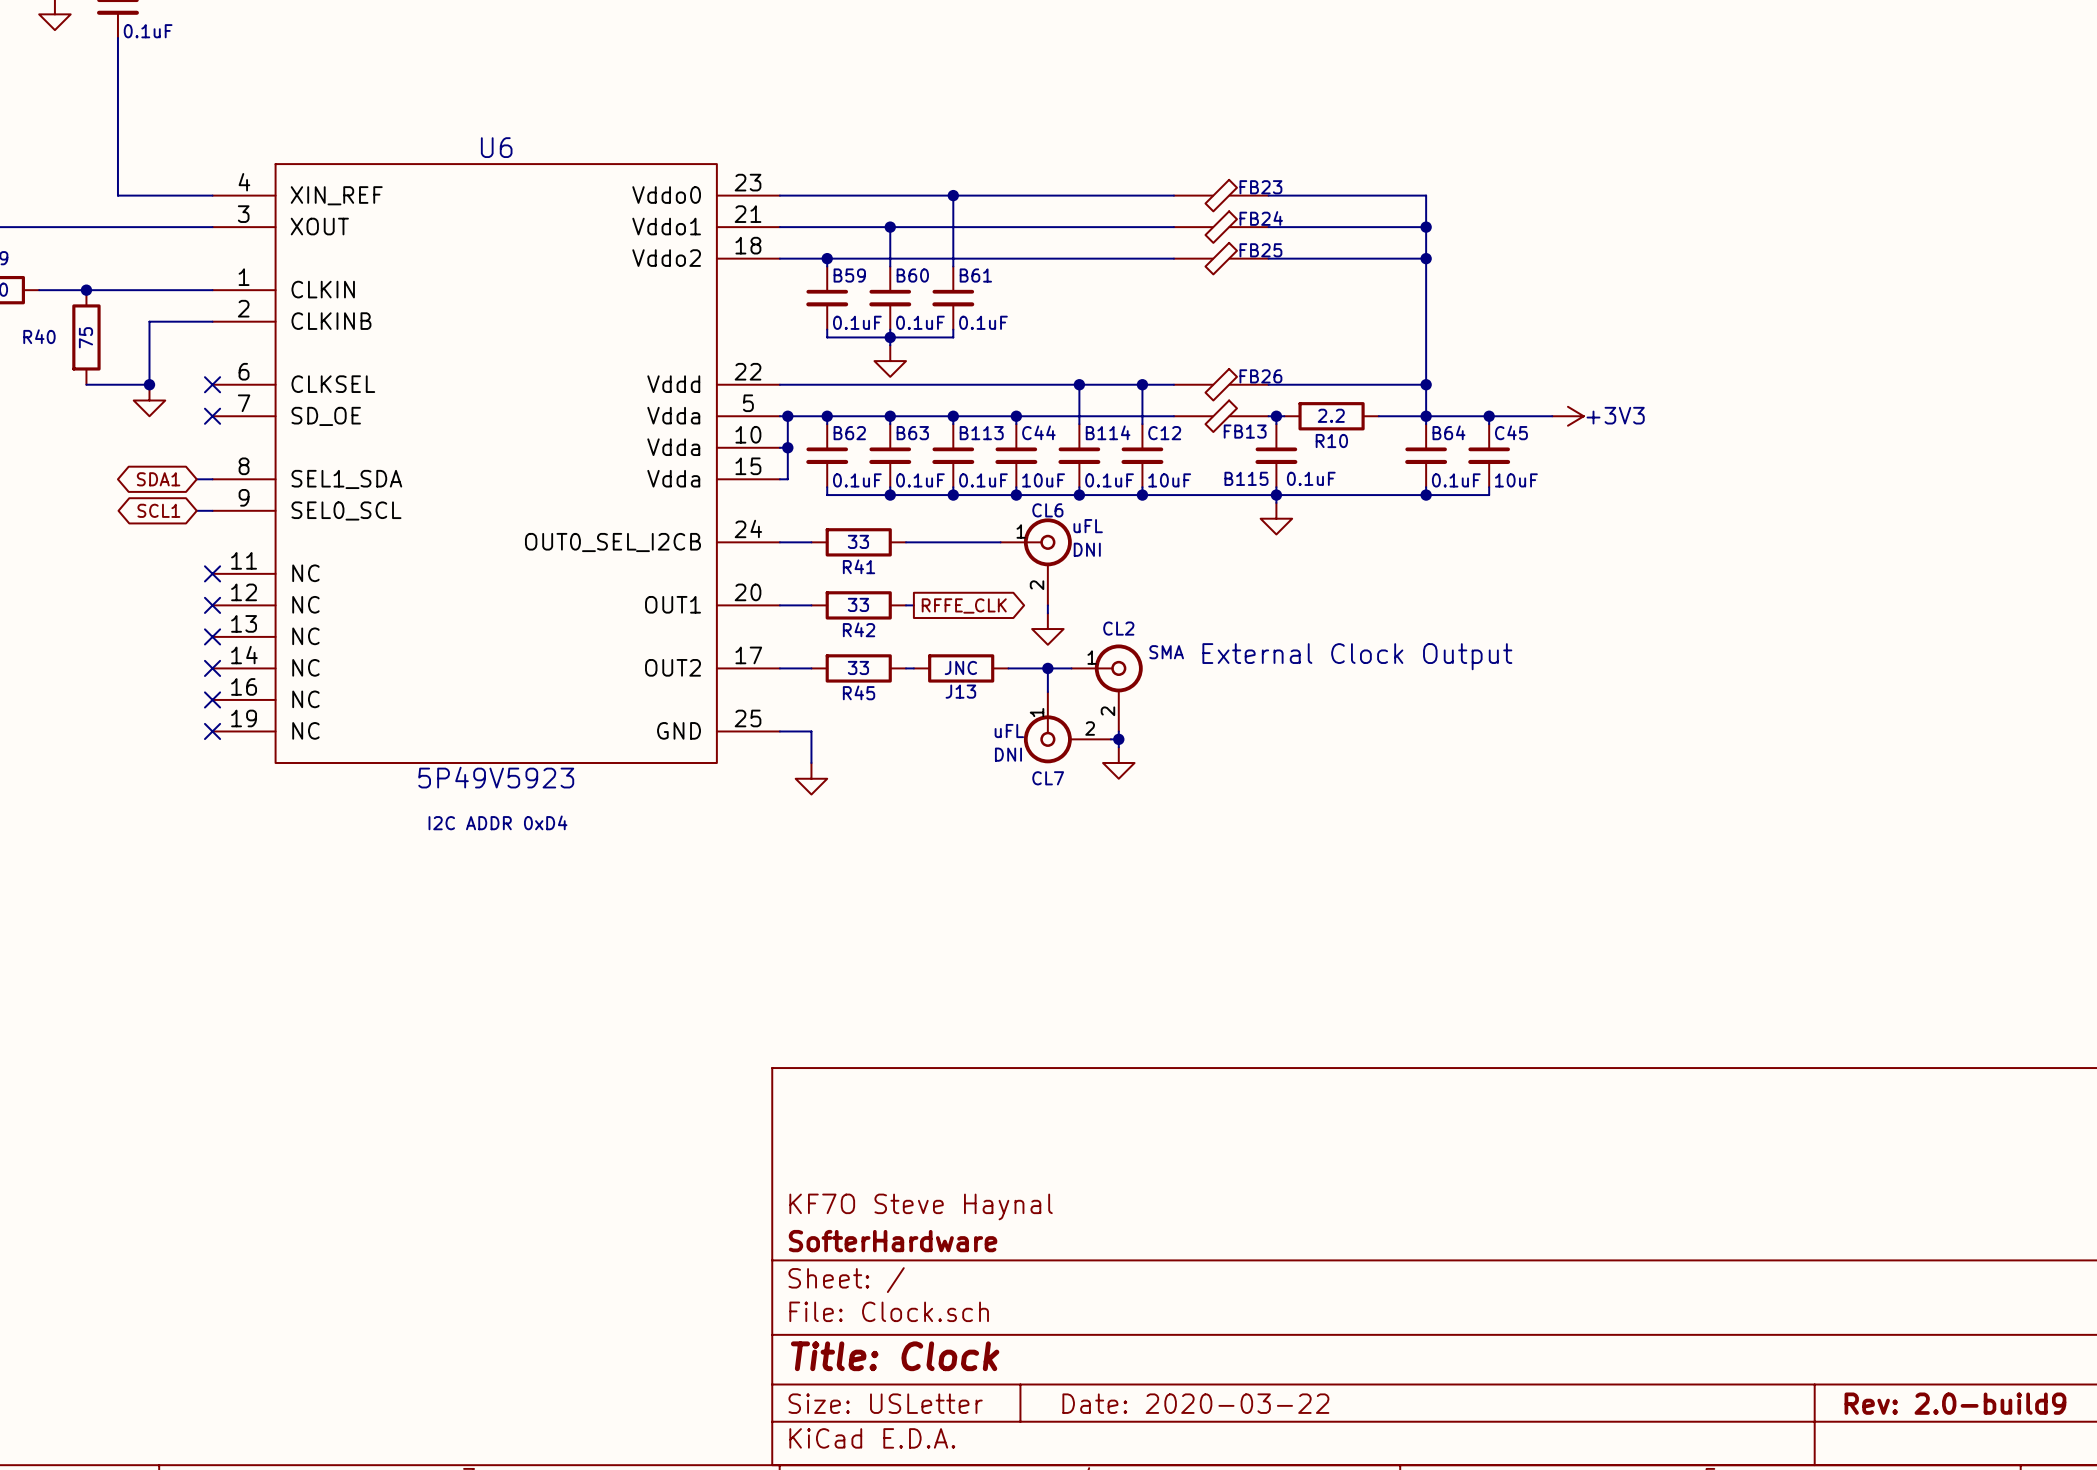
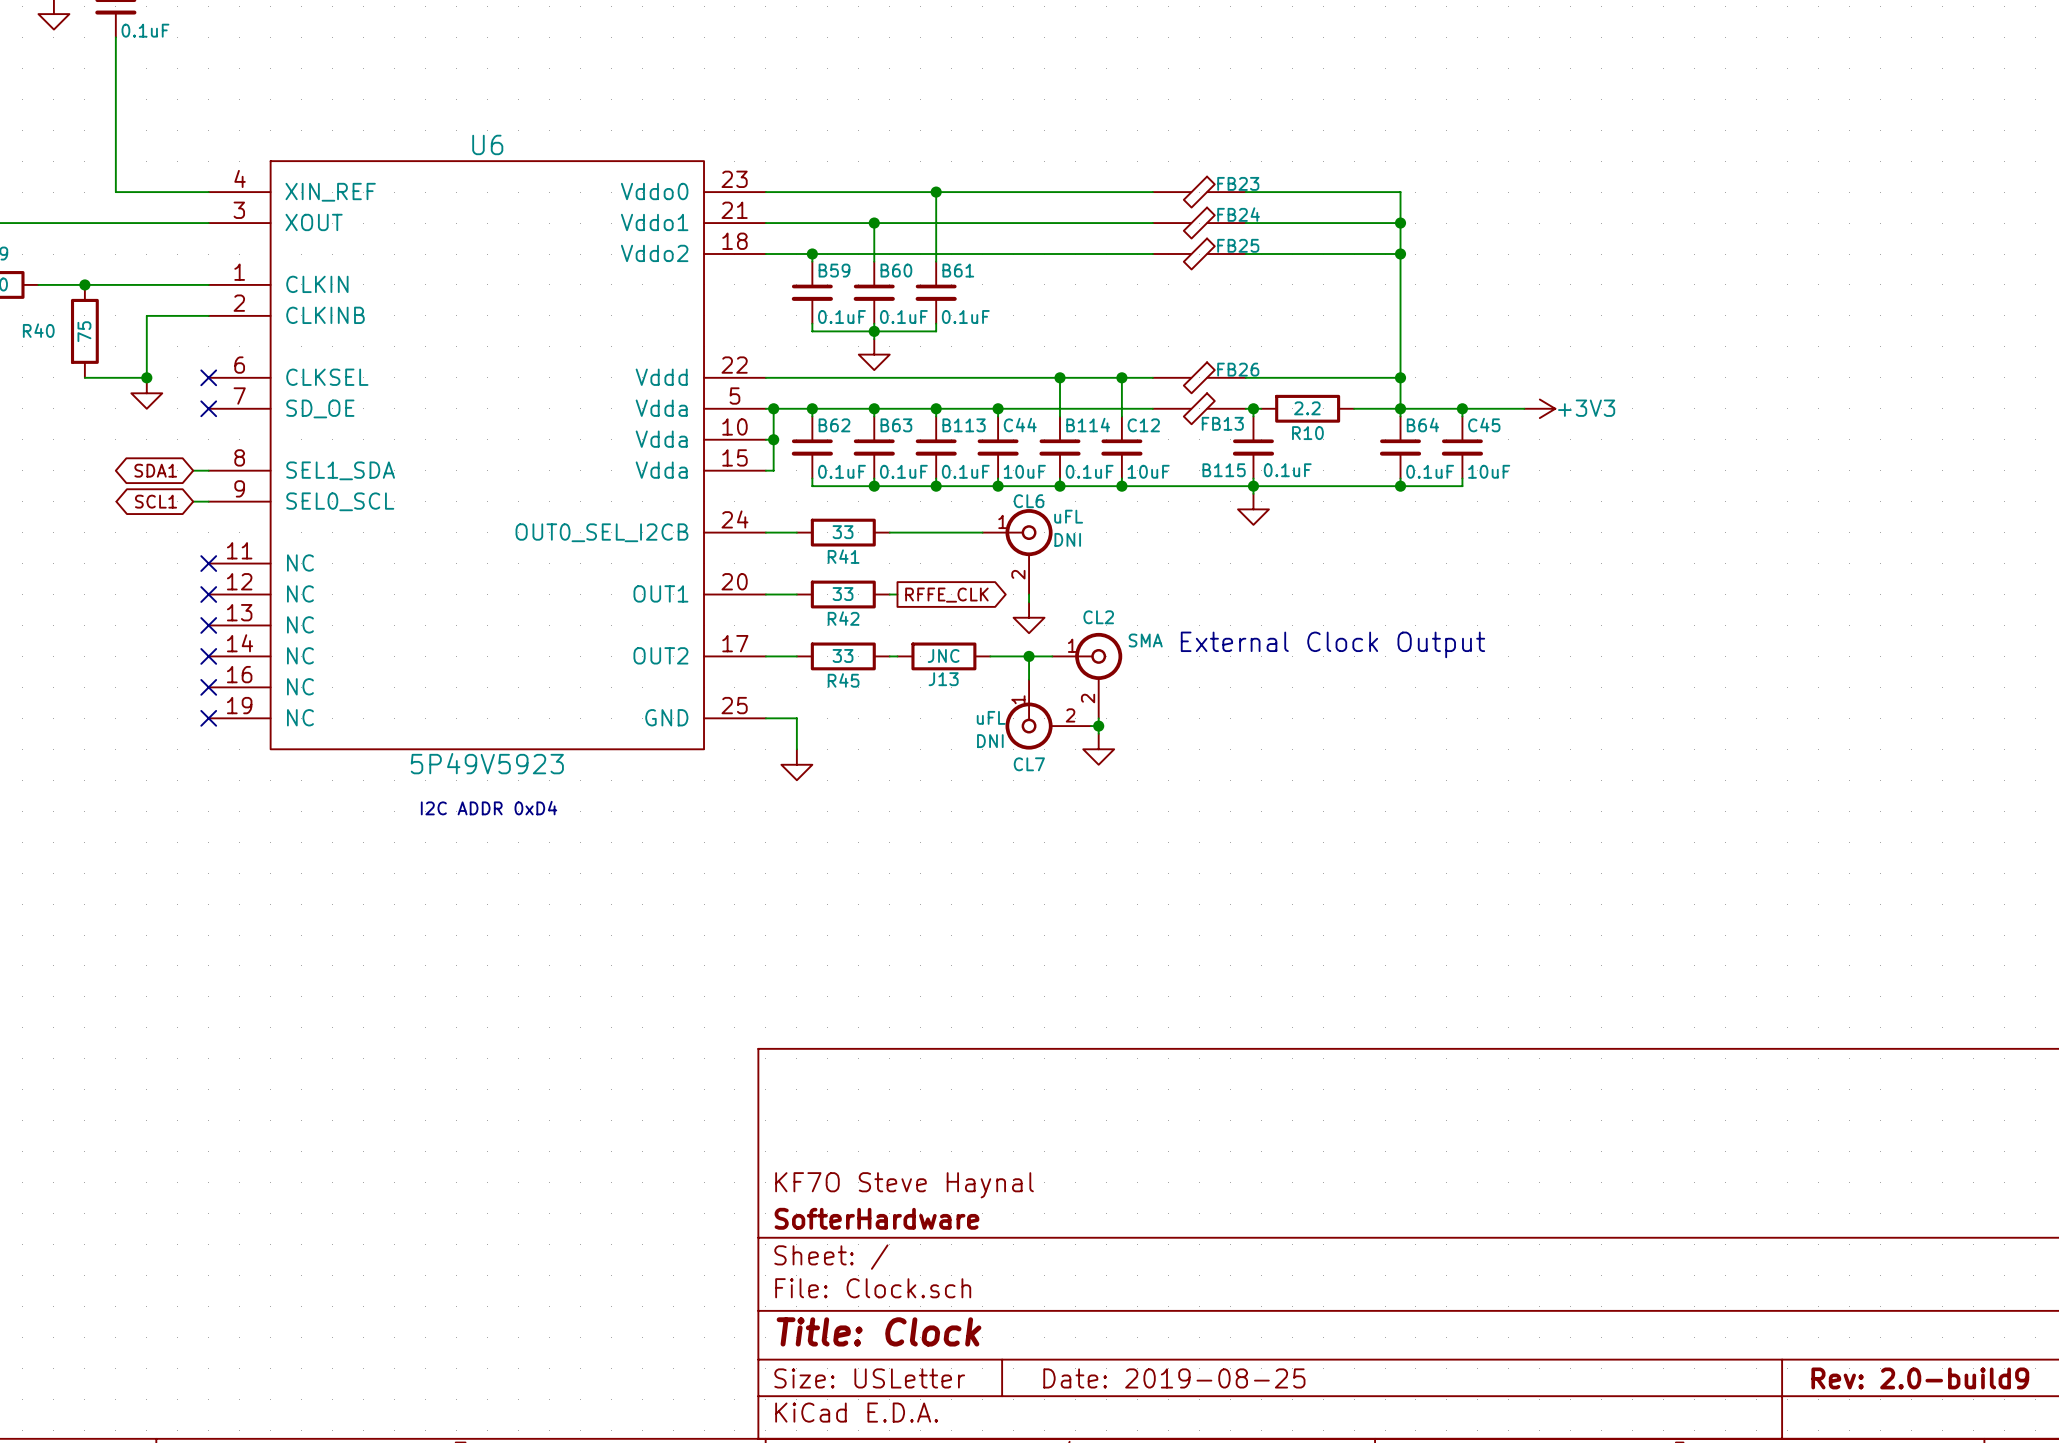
title block: Date: 2020-03-22 (1195, 1403) -> Date: 2019-08-25 (1174, 1378)

